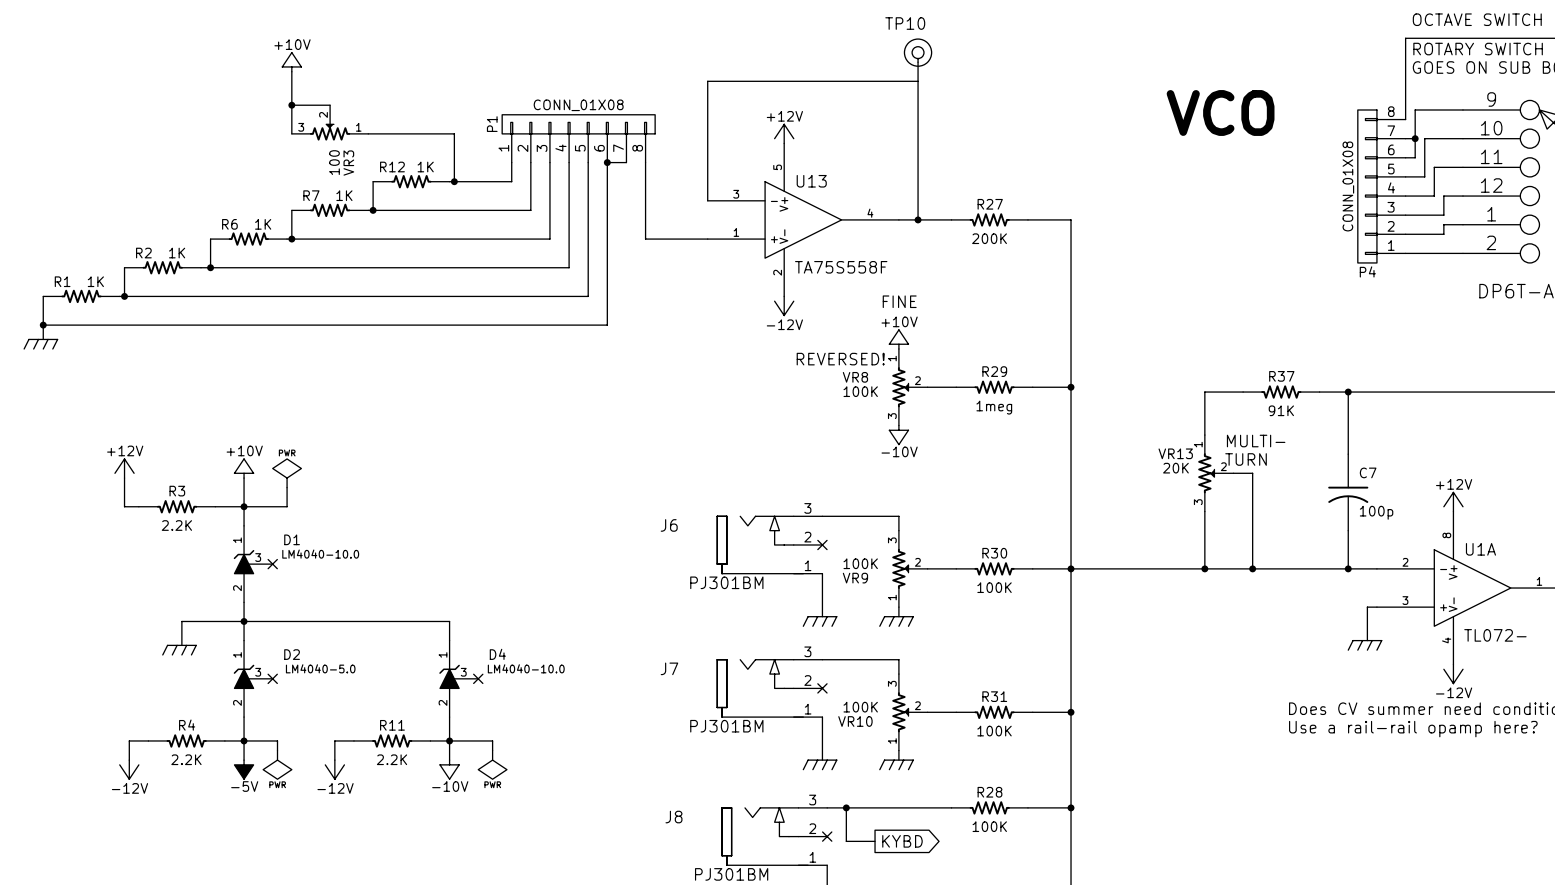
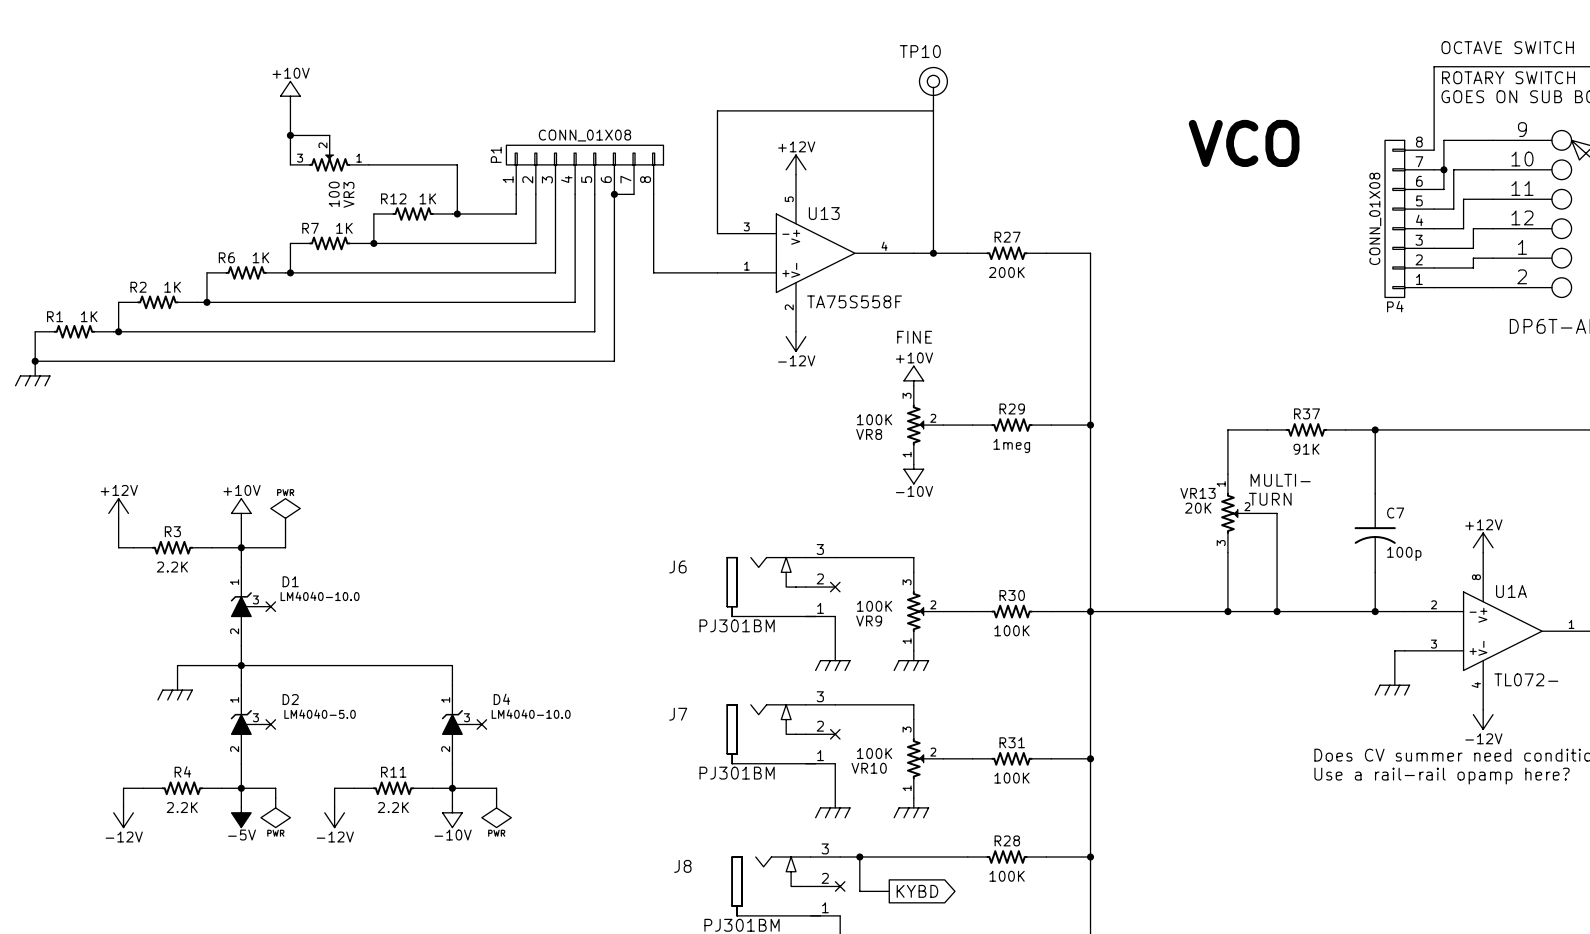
text: REVERSED! (840, 359) -> none
VR8 flip: as is (900, 387) -> up-down (915, 425)

